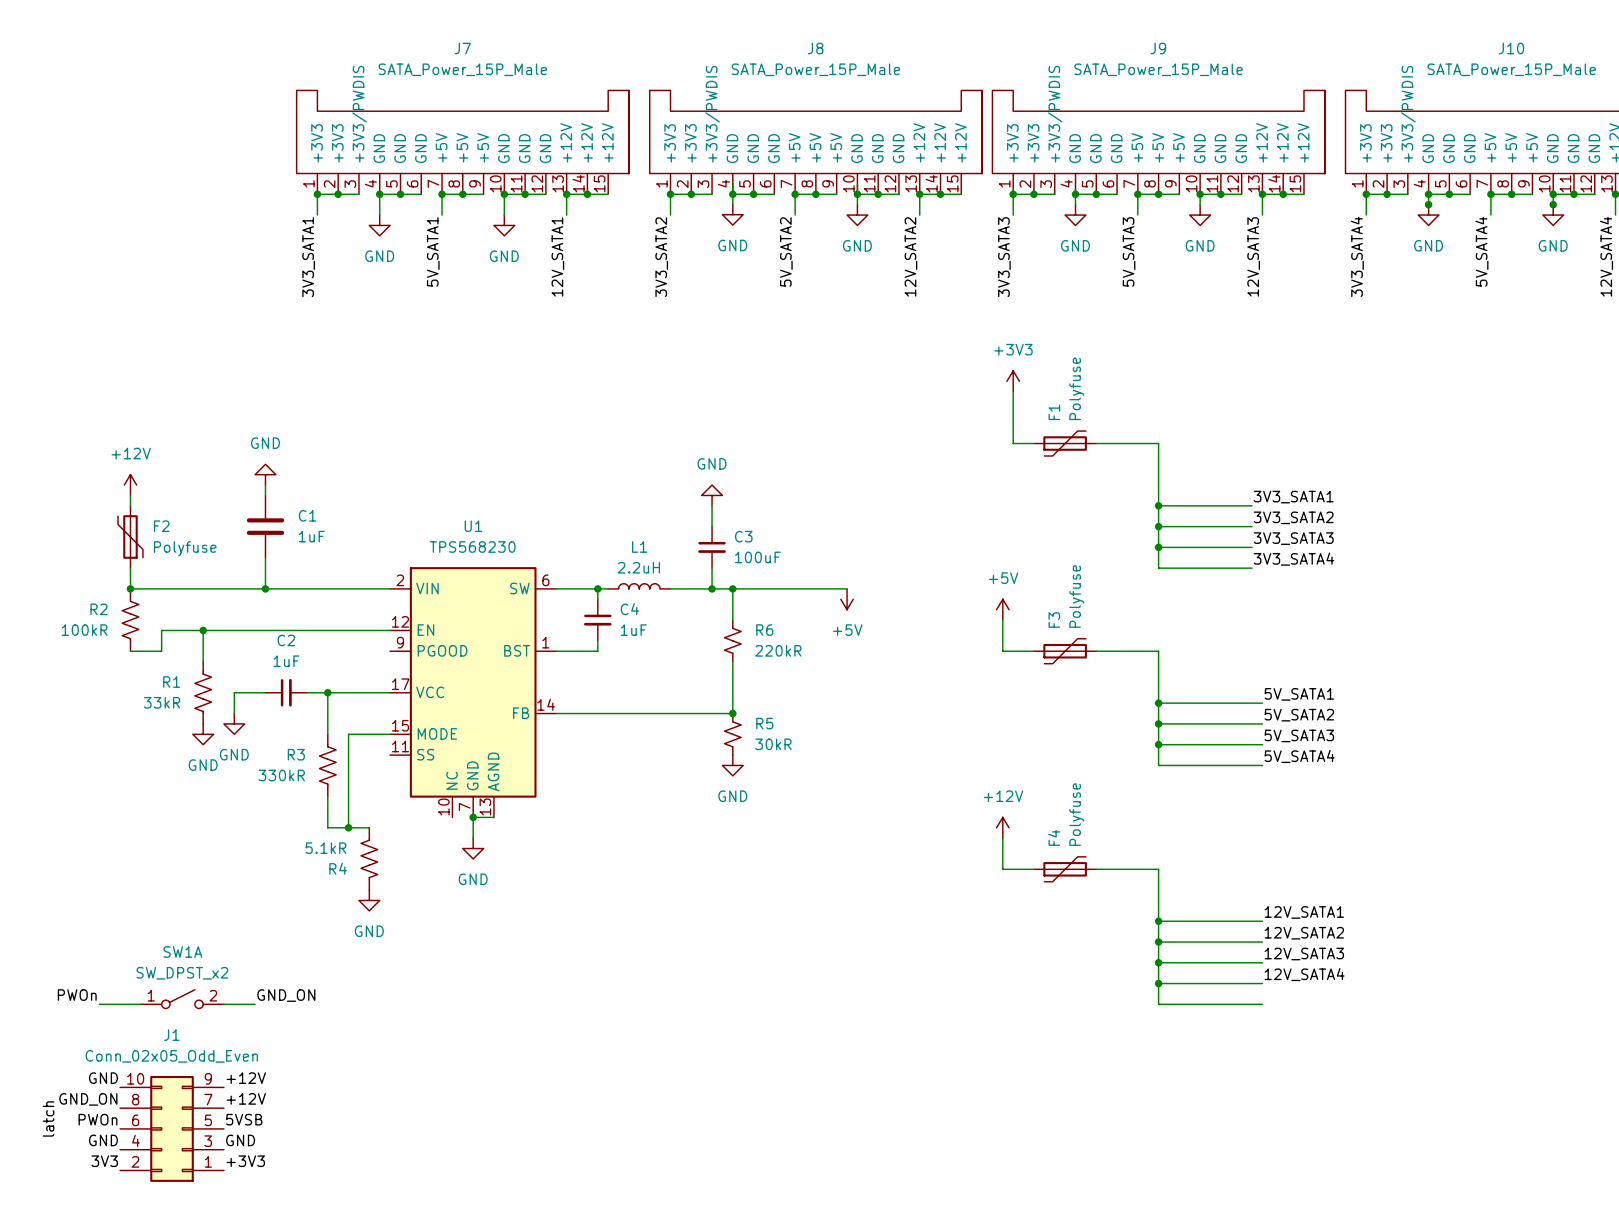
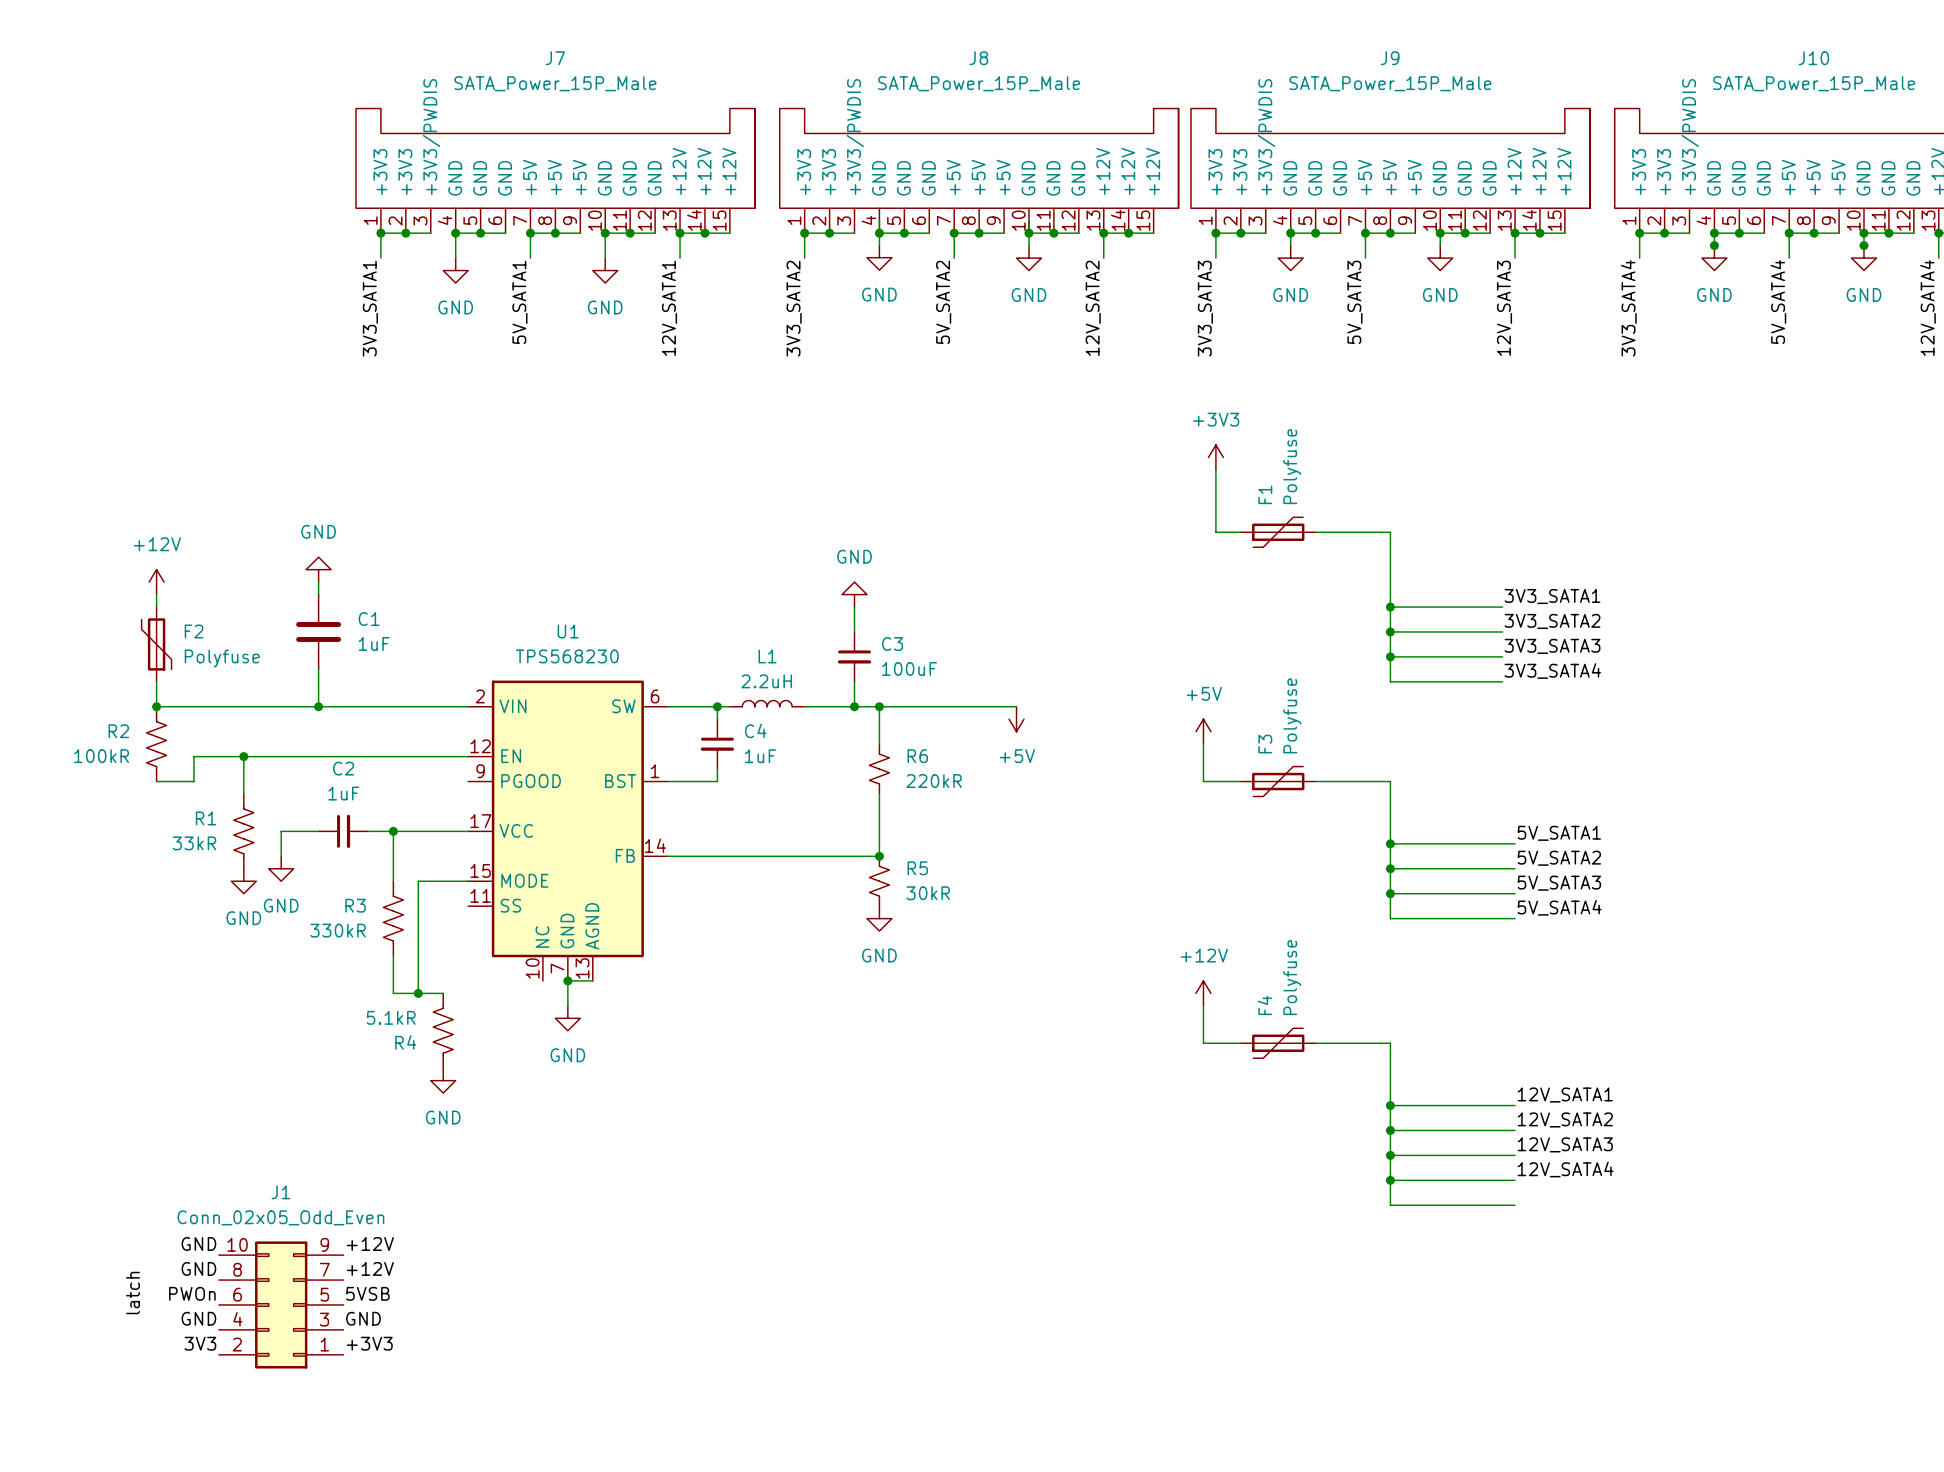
label: PWOn (77, 995) -> none
label: GND_ON (286, 995) -> none
SW1A: SW_DPST_x2 (182, 999) -> none
wire: (99, 1004) (140, 1004) -> none
wire: (223, 1004) (255, 1004) -> none
label: none -> GND (198, 1244)
label: none -> +12V (370, 1244)
label: none -> GND (198, 1268)
label: none -> +12V (370, 1268)
label: GND (103, 1078) -> none
label: none -> PWOn (192, 1293)
label: +12V (246, 1078) -> none
label: none -> GND (198, 1318)
label: +12V (246, 1098) -> none
label: none -> GND (363, 1318)
label: GND_ON (88, 1099) -> none
label position: latch (48, 1118) -> latch (133, 1293)
label: PWOn (98, 1119) -> none
label position: 5VSB (244, 1119) -> 5VSB (367, 1293)
J1 position: (172, 1128) -> (281, 1304)
label: GND (103, 1140) -> none
label: GND (240, 1140) -> none
label position: 3V3 (104, 1161) -> 3V3 (200, 1343)
label position: +3V3 (245, 1161) -> +3V3 (369, 1343)

